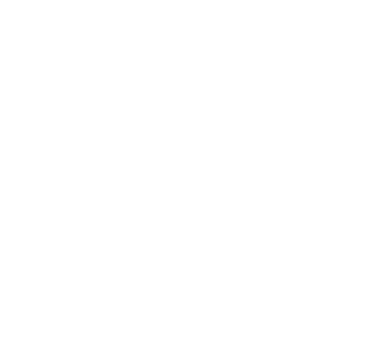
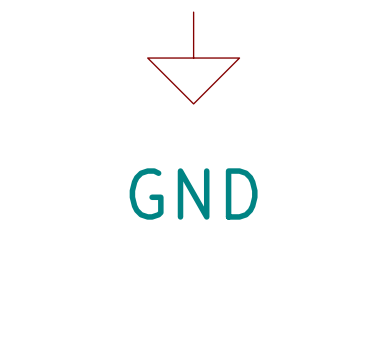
power symbol: none -> GND (193, 58)

